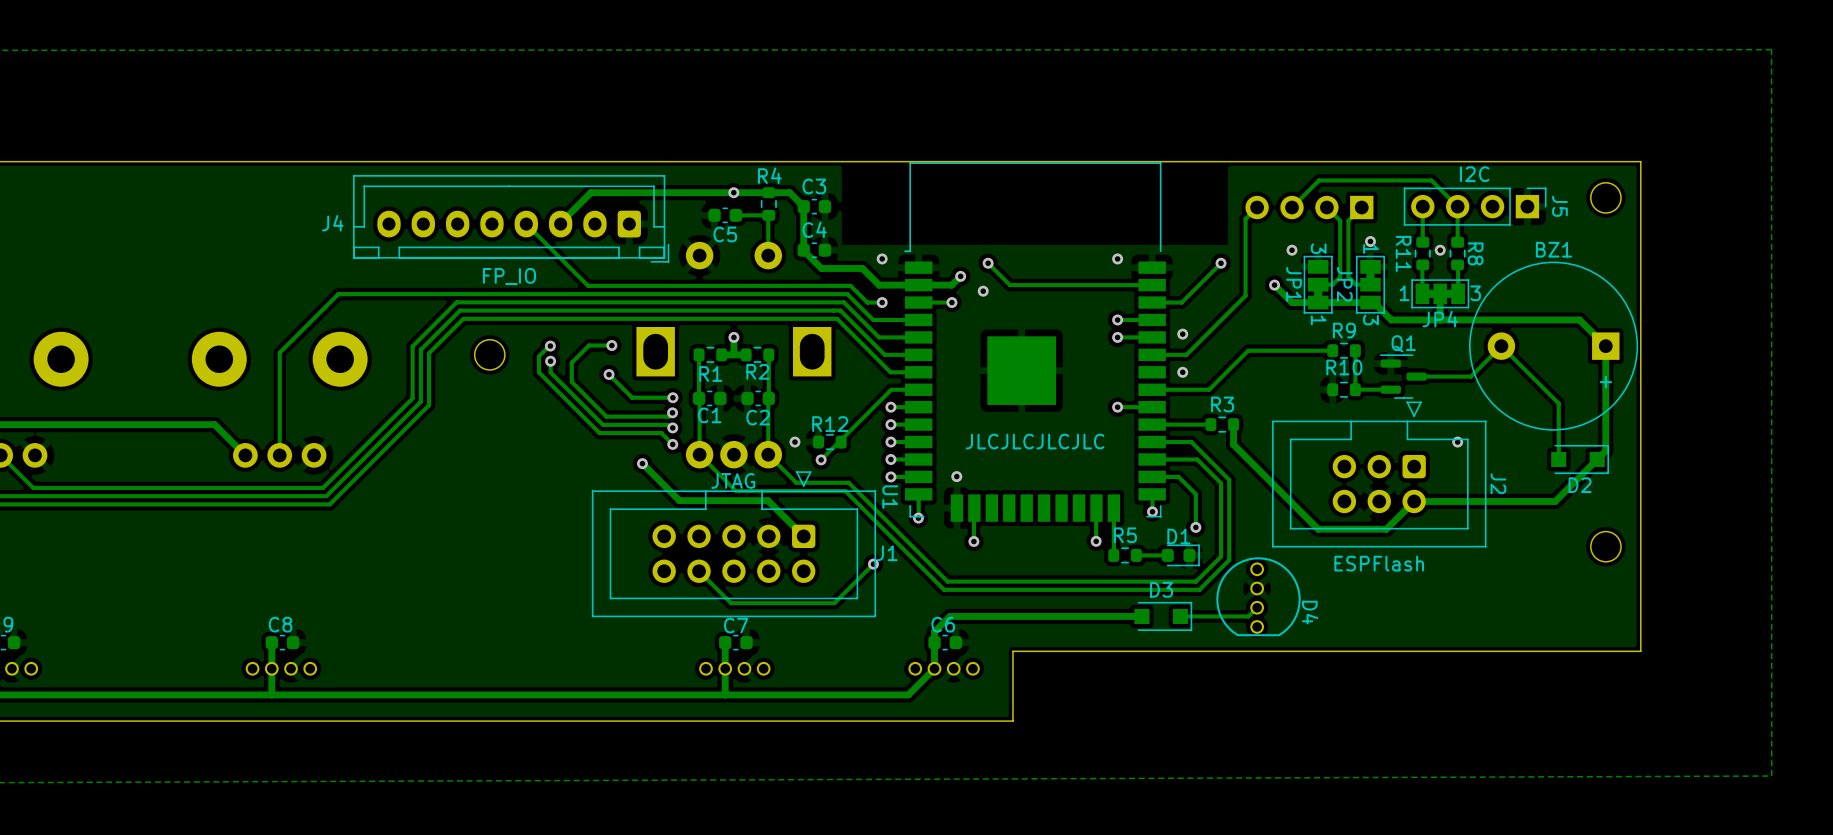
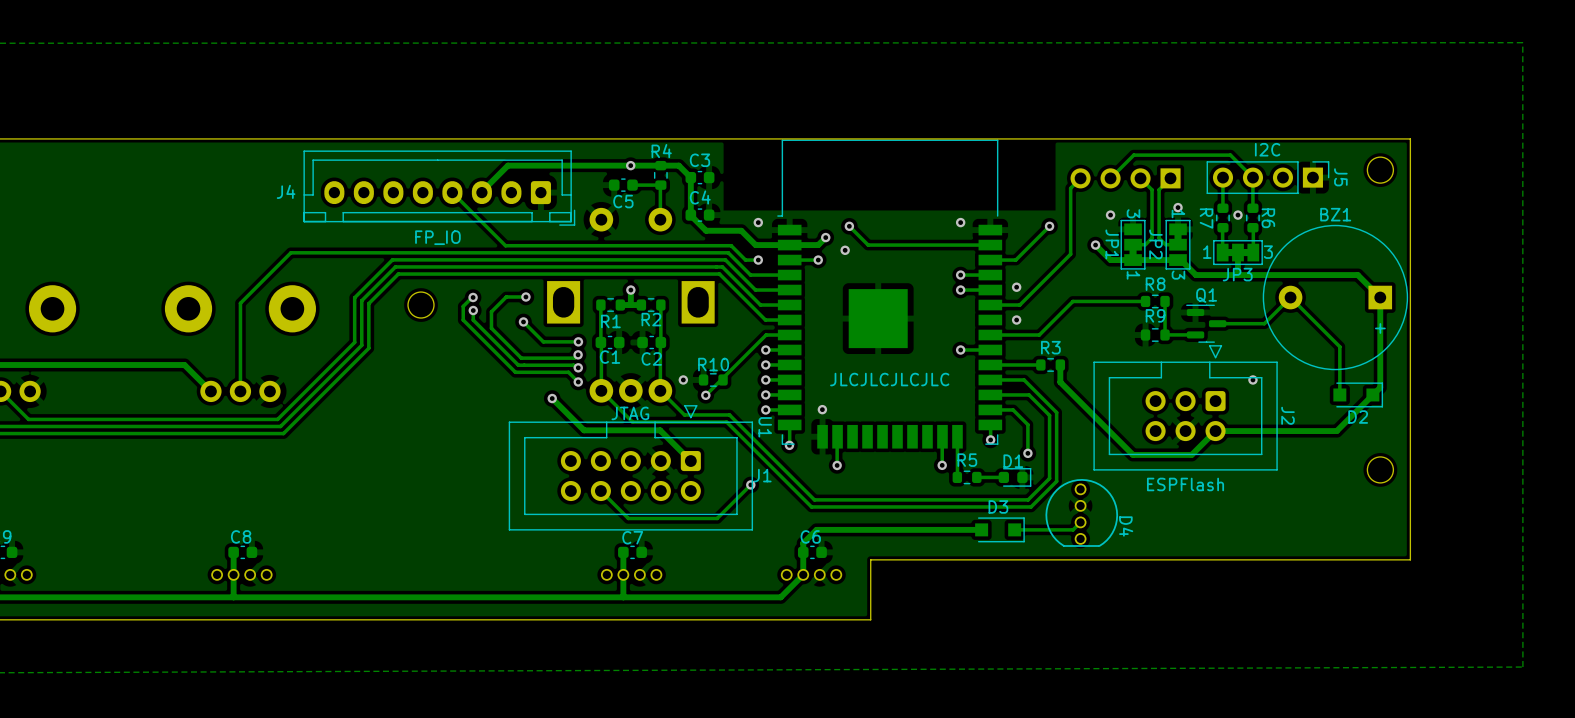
R11 name: R11 (1403, 253) -> R7 (1206, 218)
R8 name: R8 (1475, 253) -> R6 (1268, 218)
JP4 name: JP4 (1440, 319) -> JP3 (1237, 274)
R9 name: R9 (1344, 330) -> R8 (1155, 284)
R10 name: R10 (1344, 367) -> R9 (1155, 315)
R12 name: R12 (830, 424) -> R10 (713, 364)

